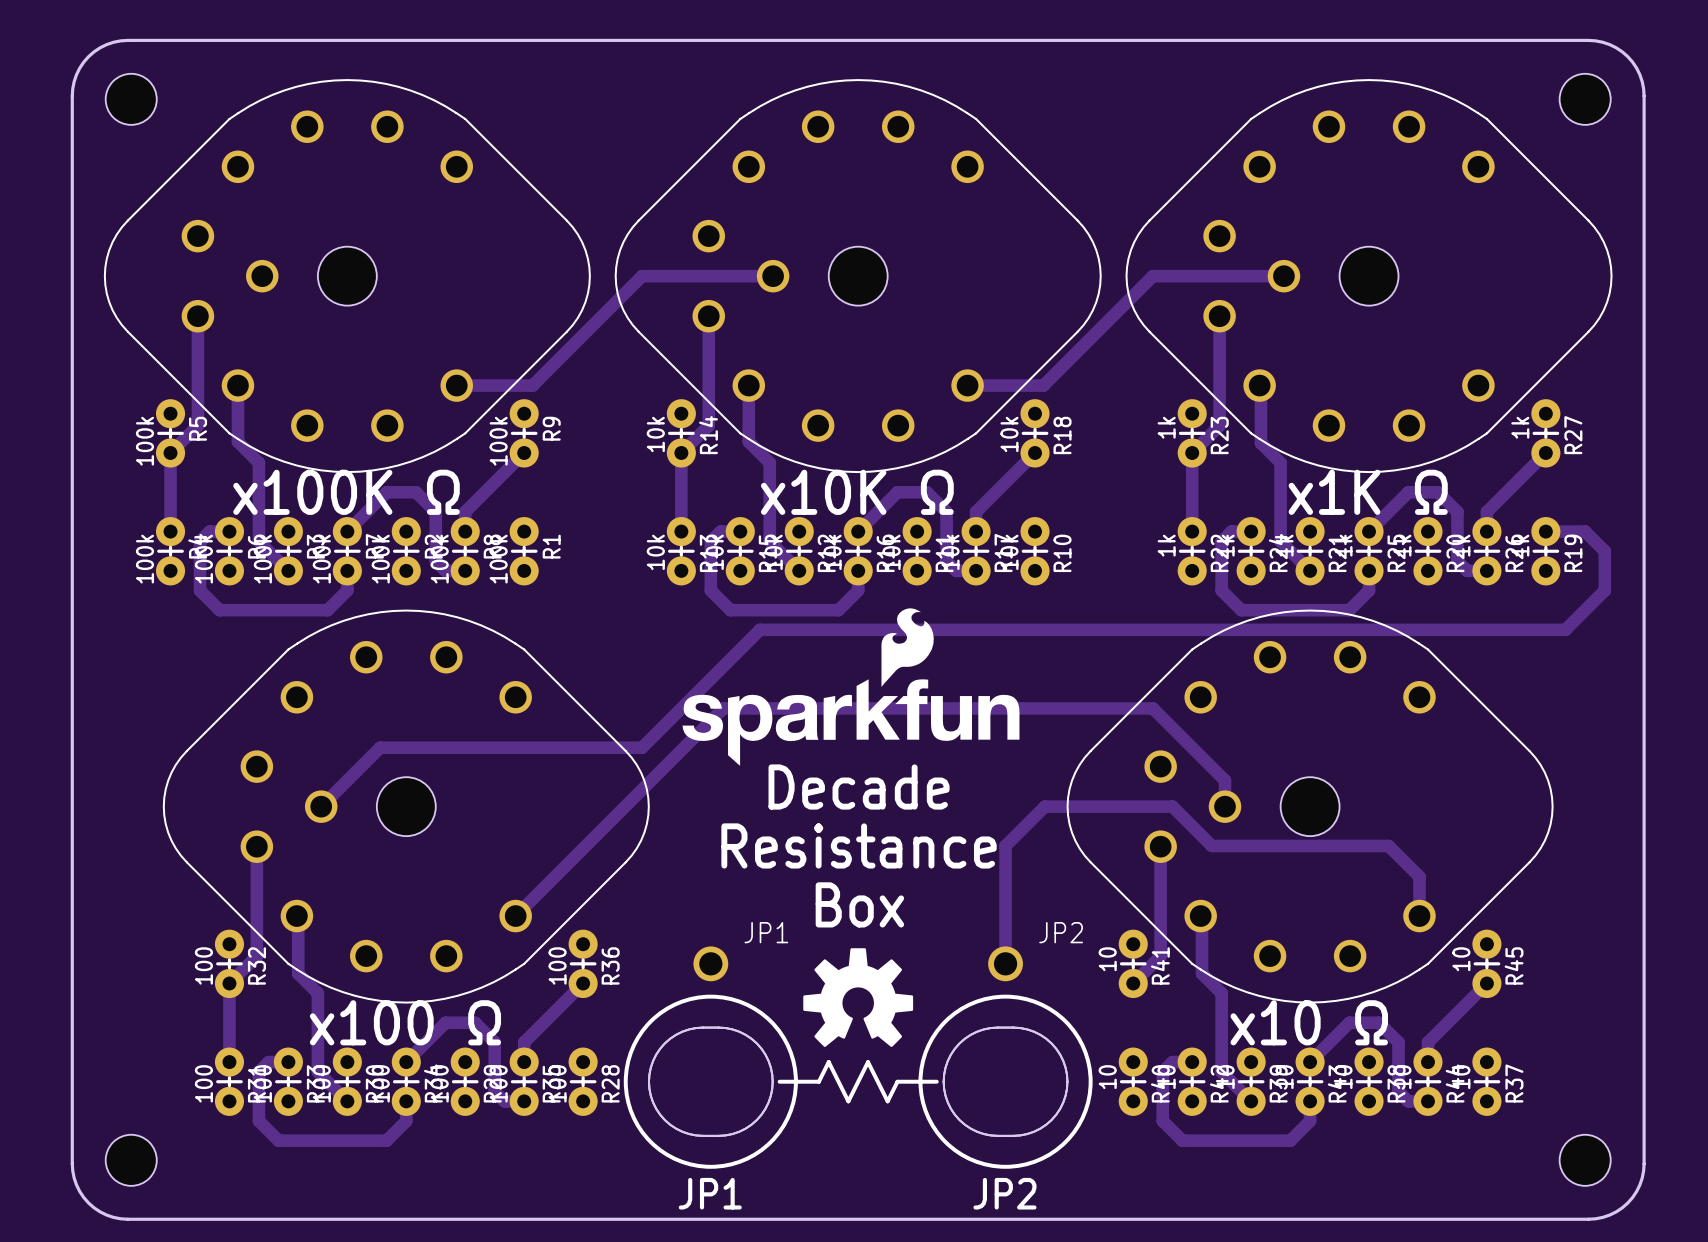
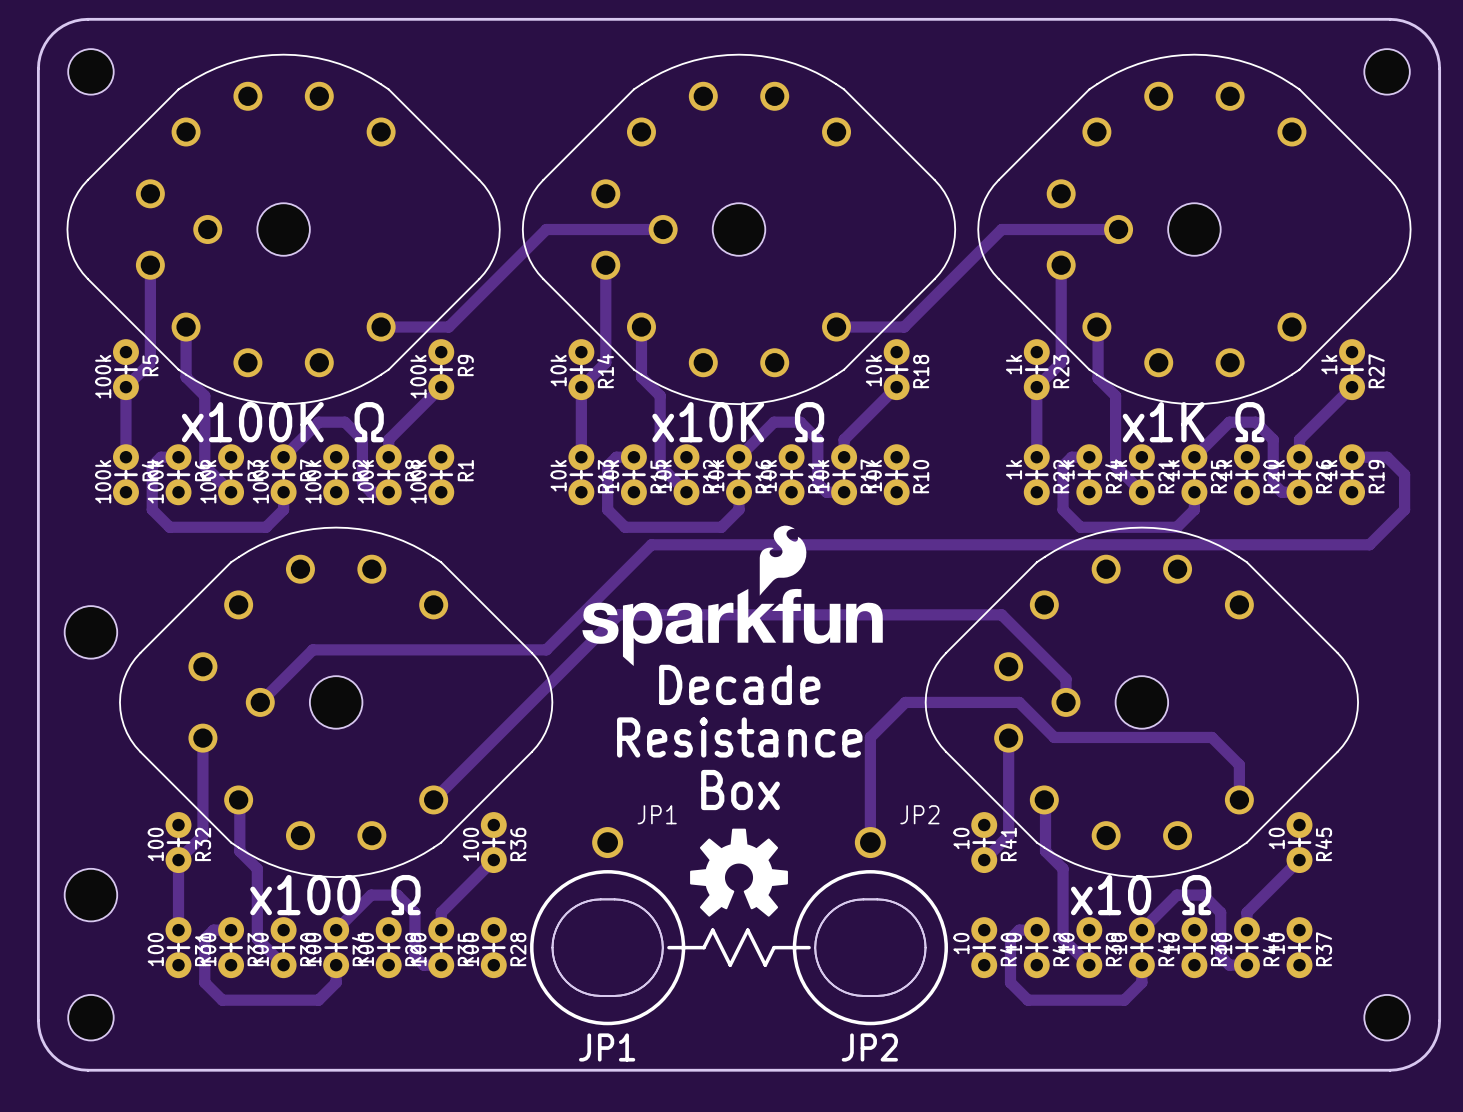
hole: none -> (90, 632)
hole: none -> (90, 895)

